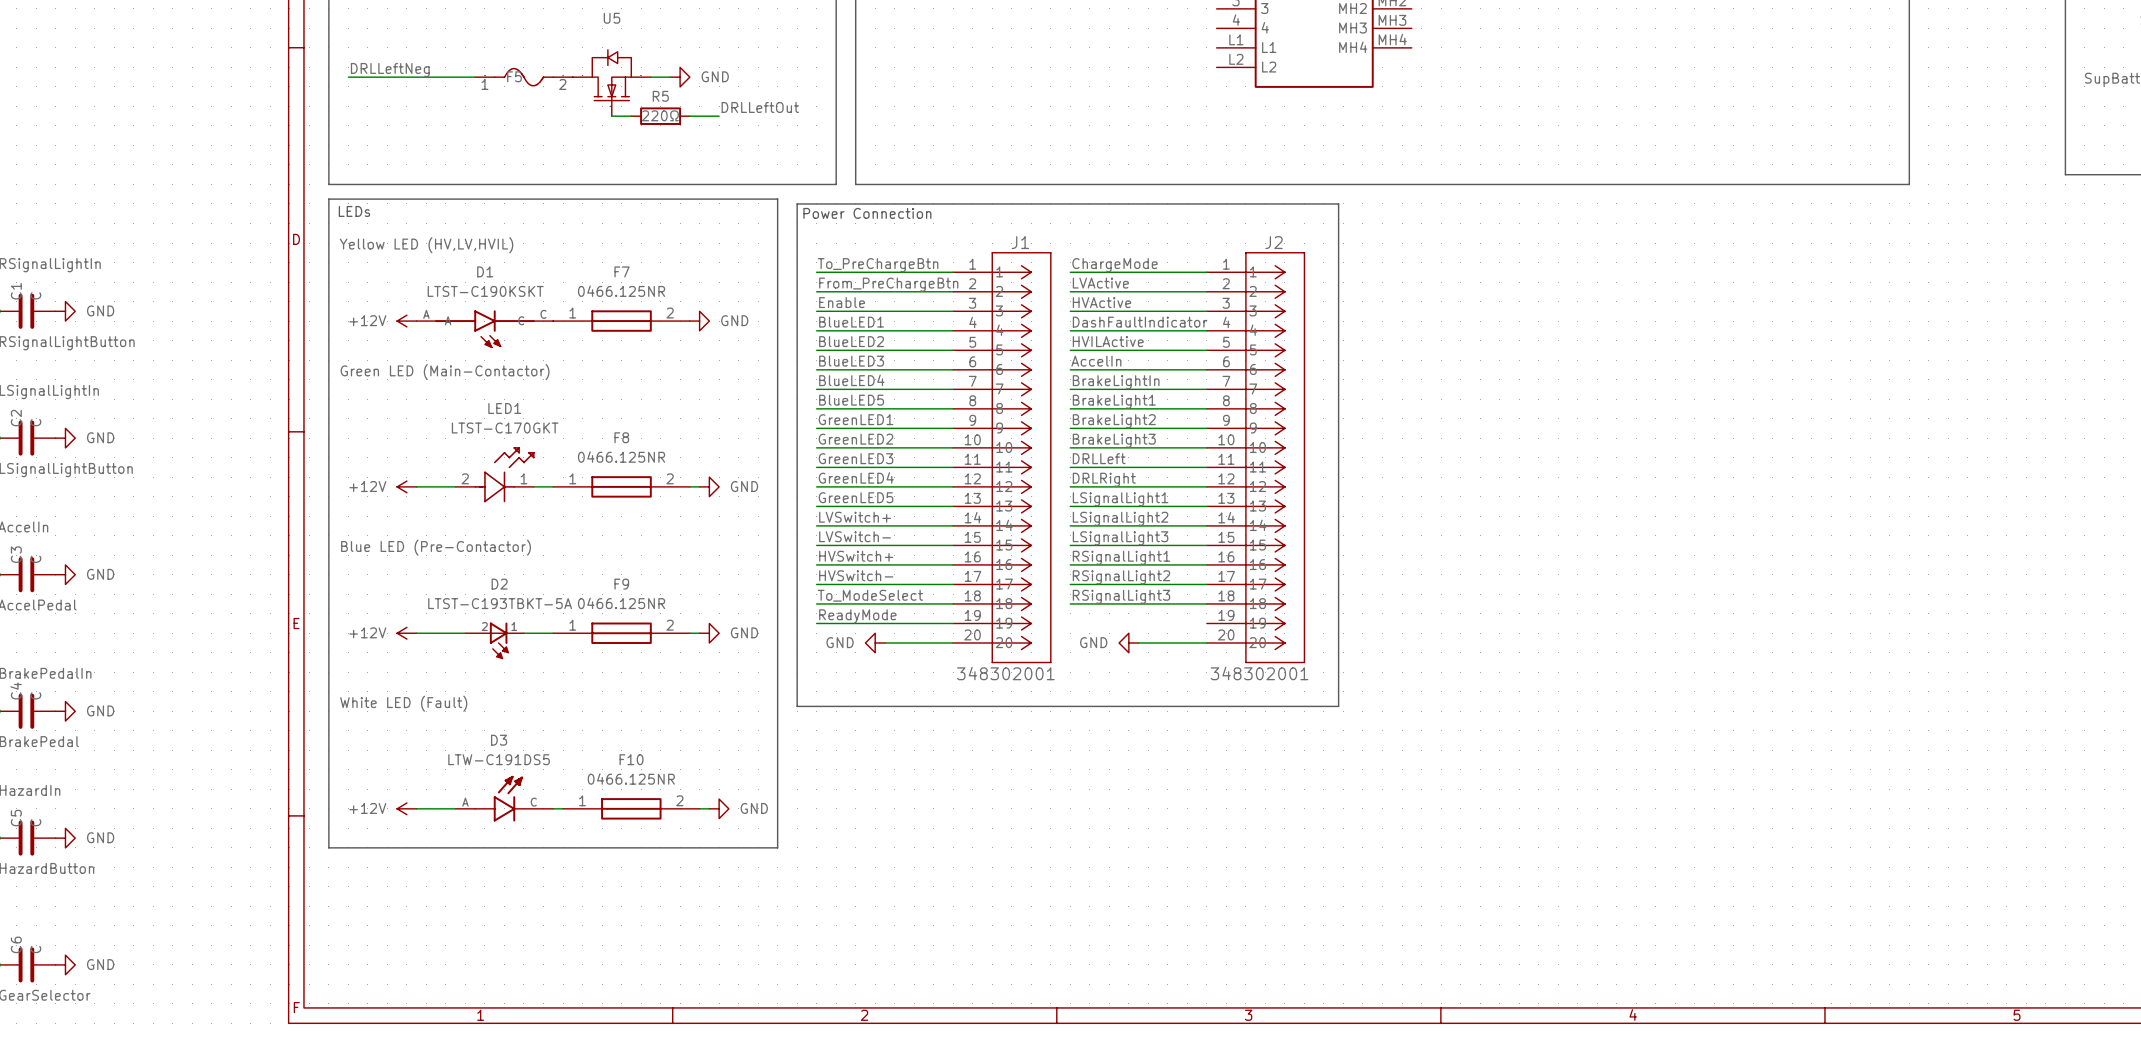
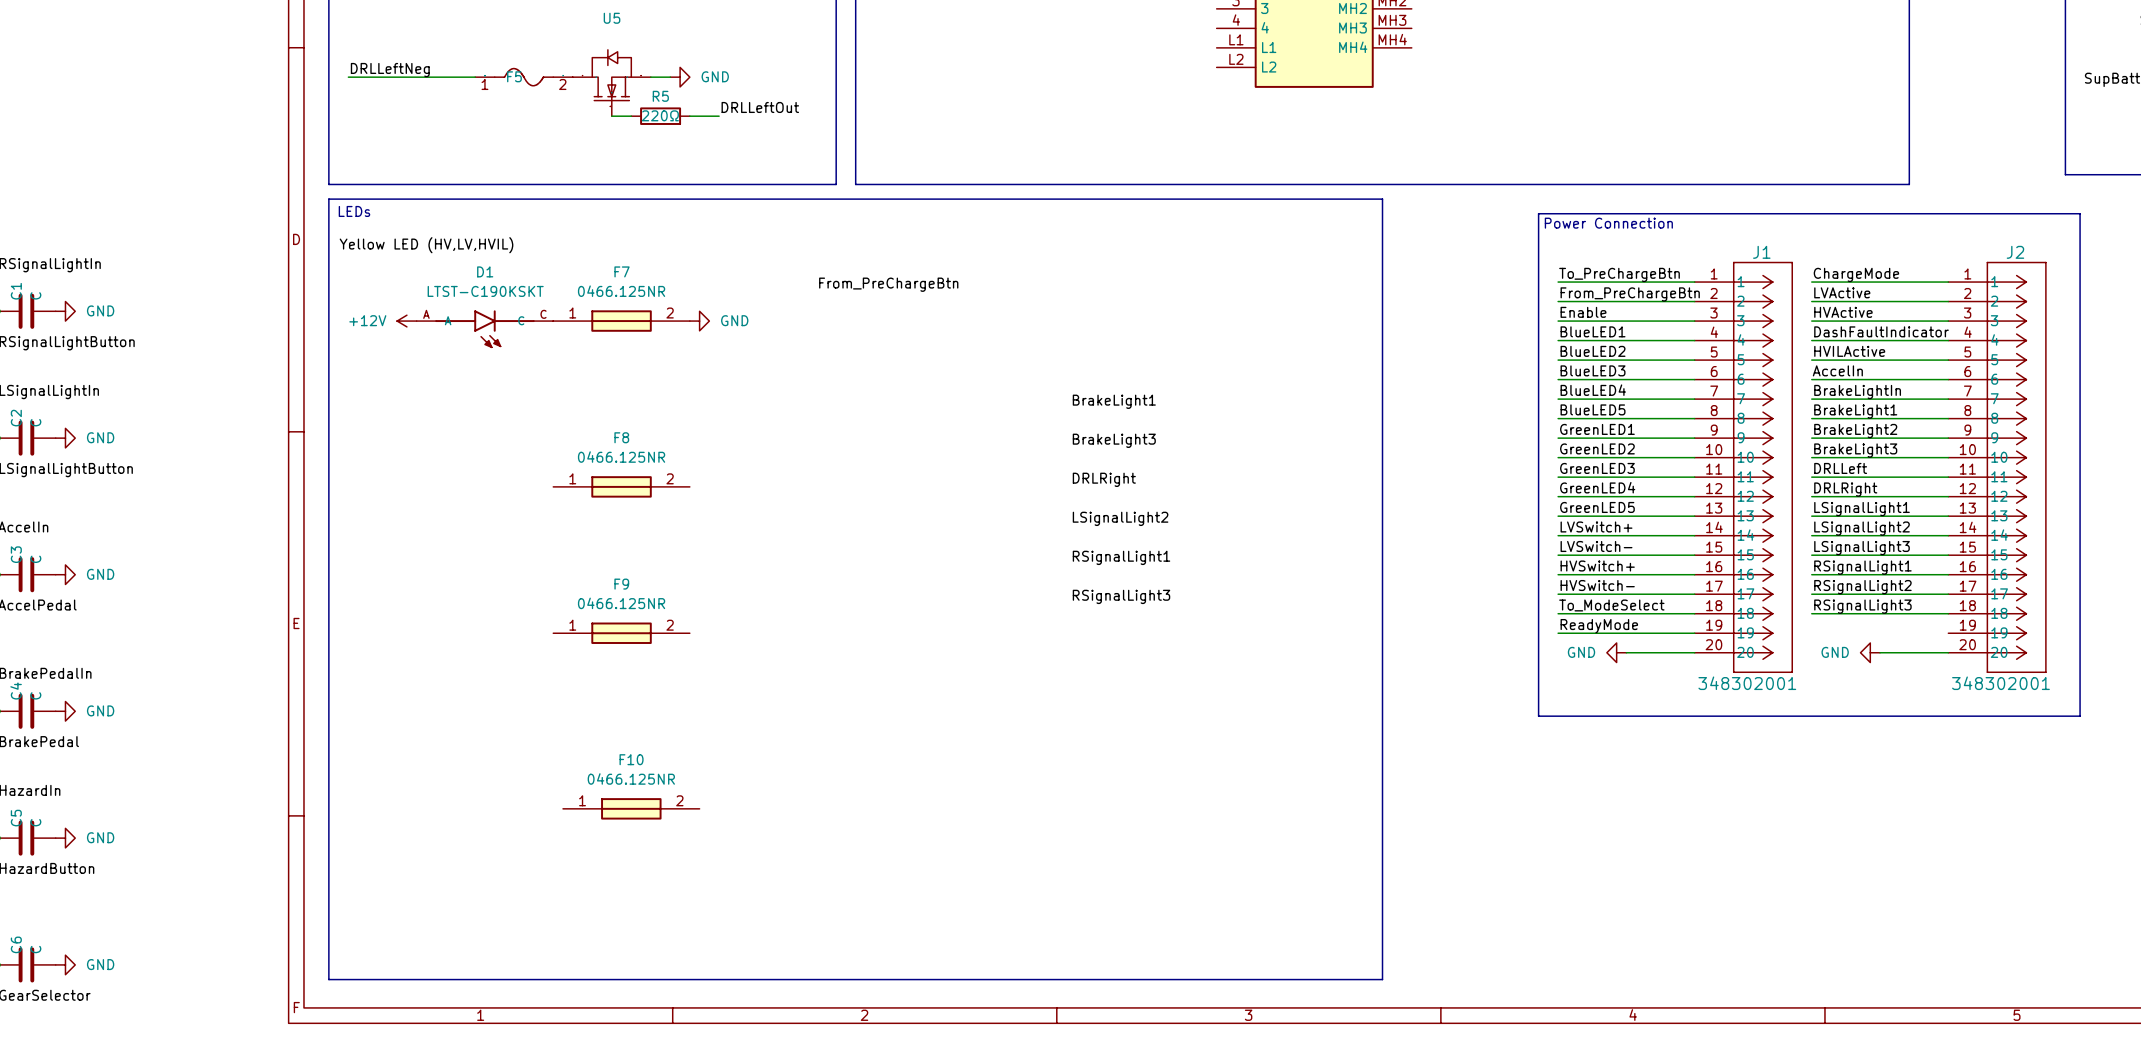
line: (777, 199) (777, 847) (328, 847) -> (777, 199) (1382, 199) (1382, 979) (328, 979) (328, 847)
line: (797, 203) (1338, 203) (1338, 706) (797, 706) (797, 203) -> none
text: Power Connection (867, 213) -> none
line: none -> (1538, 213) (2080, 213) (2080, 716) (1538, 716) (1538, 213)
text: none -> Power Connection (1608, 223)
label: To_PreChargeBtn (878, 265) -> none
label: ChargeMode (1114, 265) -> none
wire: (816, 272) (953, 272) -> none
wire: (1070, 272) (1206, 272) -> none
label: none -> To_PreChargeBtn (1619, 274)
label: none -> ChargeMode (1856, 274)
wire: none -> (1558, 282) (1694, 282)
wire: none -> (1811, 282) (1948, 282)
label: LVActive (1100, 283) -> none
wire: (816, 291) (953, 291) -> none
wire: (1070, 291) (1206, 291) -> none
label: none -> LVActive (1842, 292)
label: none -> From_PreChargeBtn (1630, 294)
wire: none -> (1558, 301) (1694, 301)
wire: none -> (1811, 301) (1948, 301)
label: Enable (842, 302) -> none
label: HVActive (1101, 302) -> none
wire: (816, 311) (953, 311) -> none
wire: (1070, 311) (1206, 311) -> none
label: none -> Enable (1583, 312)
label: none -> HVActive (1843, 312)
wire: none -> (1558, 321) (1694, 321)
wire: none -> (1811, 321) (1948, 321)
label: BlueLED1 (851, 322) -> none
label: DashFaultIndicator (1140, 322) -> none
wire: (816, 330) (953, 330) -> none
wire: (1070, 330) (1206, 330) -> none
label: none -> BlueLED1 (1593, 331)
label: none -> DashFaultIndicator (1881, 331)
wire: none -> (1558, 340) (1694, 340)
wire: none -> (1811, 340) (1948, 340)
label: BlueLED2 (851, 341) -> none
label: HVILActive (1108, 341) -> none
wire: (816, 350) (953, 350) -> none
wire: (1070, 350) (1206, 350) -> none
label: none -> BlueLED2 (1593, 351)
label: none -> HVILActive (1849, 351)
wire: none -> (1558, 360) (1694, 360)
wire: none -> (1811, 360) (1948, 360)
label: BlueLED3 (851, 361) -> none
label: AccelIn (1096, 361) -> none
wire: (816, 369) (953, 369) -> none
wire: (1070, 369) (1206, 369) -> none
label: none -> BlueLED3 (1593, 370)
label: none -> AccelIn (1837, 370)
label: Green LED (Main-Contactor) (445, 372) -> none
wire: none -> (1558, 379) (1694, 379)
wire: none -> (1811, 379) (1948, 379)
label: BlueLED4 (851, 380) -> none
label: BrakeLightIn (1116, 382) -> none
wire: (816, 389) (953, 389) -> none
wire: (1070, 389) (1206, 389) -> none
label: none -> BlueLED4 (1593, 390)
label: none -> BrakeLightIn (1857, 392)
wire: none -> (1558, 399) (1694, 399)
wire: none -> (1811, 399) (1948, 399)
label: BlueLED5 (851, 400) -> none
wire: (816, 408) (953, 408) -> none
wire: (1070, 408) (1206, 408) -> none
label: none -> BlueLED5 (1593, 409)
label: none -> BrakeLight1 (1855, 411)
wire: none -> (1558, 418) (1694, 418)
wire: none -> (1811, 418) (1948, 418)
label: GreenLED1 (855, 419) -> none
label: BrakeLight2 (1114, 421) -> none
wire: (816, 428) (953, 428) -> none
wire: (1070, 428) (1206, 428) -> none
label: none -> GreenLED1 (1597, 429)
label: none -> BrakeLight2 (1855, 431)
wire: none -> (1558, 438) (1694, 438)
wire: none -> (1811, 438) (1948, 438)
label: GreenLED2 (855, 439) -> none
wire: (816, 447) (953, 447) -> none
wire: (1070, 447) (1206, 447) -> none
label: none -> GreenLED2 (1597, 448)
label: none -> BrakeLight3 (1855, 450)
J1 position: (1002, 457) -> (1743, 467)
J2 position: (1255, 457) -> (1997, 467)
wire: none -> (1558, 457) (1694, 457)
wire: none -> (1811, 457) (1948, 457)
label: GreenLED3 (855, 458) -> none
label: DRLLeft (1099, 458) -> none
wire: (816, 467) (953, 467) -> none
wire: (1070, 467) (1206, 467) -> none
label: none -> GreenLED3 (1597, 468)
label: none -> DRLLeft (1840, 468)
LED1: LTST-C170GKT (495, 474) -> none
label: GreenLED4 (856, 477) -> none
wire: none -> (1558, 477) (1694, 477)
wire: none -> (1811, 477) (1948, 477)
power symbol: +12V (406, 486) -> none
wire: (416, 486) (455, 486) -> none
wire: (533, 486) (553, 486) -> none
wire: (689, 486) (699, 486) -> none
power symbol: GND (709, 486) -> none
wire: (816, 486) (953, 486) -> none
wire: (1070, 486) (1206, 486) -> none
label: none -> GreenLED4 (1597, 487)
label: none -> DRLRight (1845, 489)
wire: none -> (1558, 496) (1694, 496)
wire: none -> (1811, 496) (1948, 496)
label: GreenLED5 (855, 497) -> none
label: LSignalLight1 (1120, 499) -> none
wire: (816, 506) (953, 506) -> none
wire: (1070, 506) (1206, 506) -> none
label: none -> GreenLED5 (1597, 507)
label: none -> LSignalLight1 (1862, 509)
wire: none -> (1558, 516) (1694, 516)
wire: none -> (1811, 516) (1948, 516)
label: LVSwitch+ (855, 517) -> none
wire: (816, 525) (953, 525) -> none
wire: (1070, 525) (1206, 525) -> none
label: none -> LVSwitch+ (1596, 526)
label: none -> LSignalLight2 (1862, 528)
wire: none -> (1558, 535) (1694, 535)
wire: none -> (1811, 535) (1948, 535)
label: LVSwitch- (855, 536) -> none
label: LSignalLight3 (1120, 538) -> none
wire: (816, 545) (953, 545) -> none
wire: (1070, 545) (1206, 545) -> none
label: none -> LVSwitch- (1596, 546)
label: Blue LED (Pre-Contactor) (436, 547) -> none
label: none -> LSignalLight3 (1862, 548)
wire: none -> (1558, 555) (1694, 555)
wire: none -> (1811, 555) (1948, 555)
label: HVSwitch+ (856, 556) -> none
wire: (816, 564) (953, 564) -> none
wire: (1070, 564) (1206, 564) -> none
label: none -> HVSwitch+ (1597, 566)
label: none -> RSignalLight1 (1862, 567)
wire: none -> (1558, 574) (1694, 574)
wire: none -> (1811, 574) (1948, 574)
label: HVSwitch- (856, 575) -> none
label: RSignalLight2 (1121, 577) -> none
wire: (816, 584) (953, 584) -> none
wire: (1070, 584) (1206, 584) -> none
label: none -> HVSwitch- (1597, 585)
label: none -> RSignalLight2 (1862, 587)
wire: none -> (1558, 594) (1694, 594)
wire: none -> (1811, 594) (1948, 594)
label: To_ModeSelect (870, 595) -> none
wire: (816, 603) (953, 603) -> none
wire: (1070, 603) (1206, 603) -> none
label: none -> To_ModeSelect (1611, 605)
label: none -> RSignalLight3 (1862, 606)
wire: none -> (1558, 613) (1694, 613)
wire: none -> (1811, 613) (1948, 613)
label: ReadyMode (857, 616) -> none
wire: (816, 623) (953, 623) -> none
label: none -> ReadyMode (1599, 626)
power symbol: +12V (406, 633) -> none
wire: (416, 633) (465, 633) -> none
wire: (523, 633) (553, 633) -> none
wire: (689, 633) (699, 633) -> none
power symbol: GND (709, 633) -> none
wire: none -> (1558, 633) (1694, 633)
D2: LTST-C193TBKT-5A (494, 640) -> none
power symbol: GND (875, 642) -> none
wire: (884, 642) (953, 642) -> none
power symbol: GND (1128, 642) -> none
wire: (1138, 642) (1206, 642) -> none
power symbol: none -> GND (1616, 652)
wire: none -> (1626, 652) (1694, 652)
power symbol: none -> GND (1870, 652)
wire: none -> (1880, 652) (1948, 652)
label: White LED (Fault) (403, 703) -> none
D3: LTW-C191DS5 (504, 798) -> none
power symbol: +12V (406, 808) -> none
wire: (416, 808) (455, 808) -> none
wire: (553, 808) (563, 808) -> none
wire: (699, 808) (709, 808) -> none
power symbol: GND (719, 808) -> none

